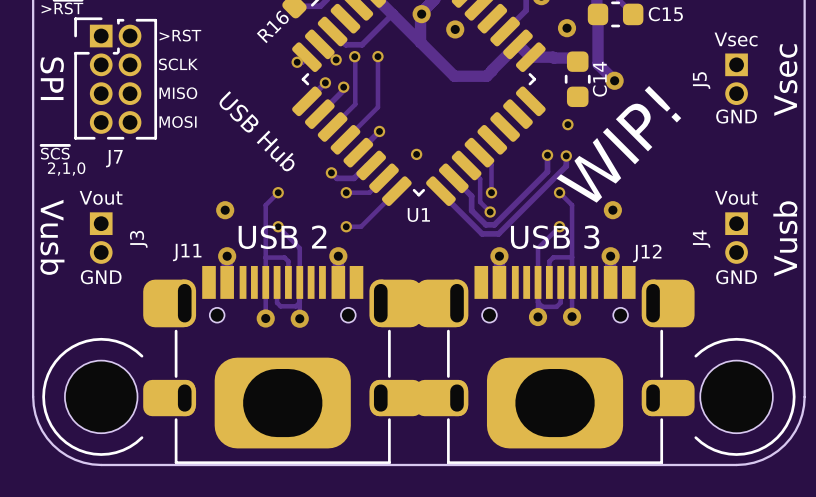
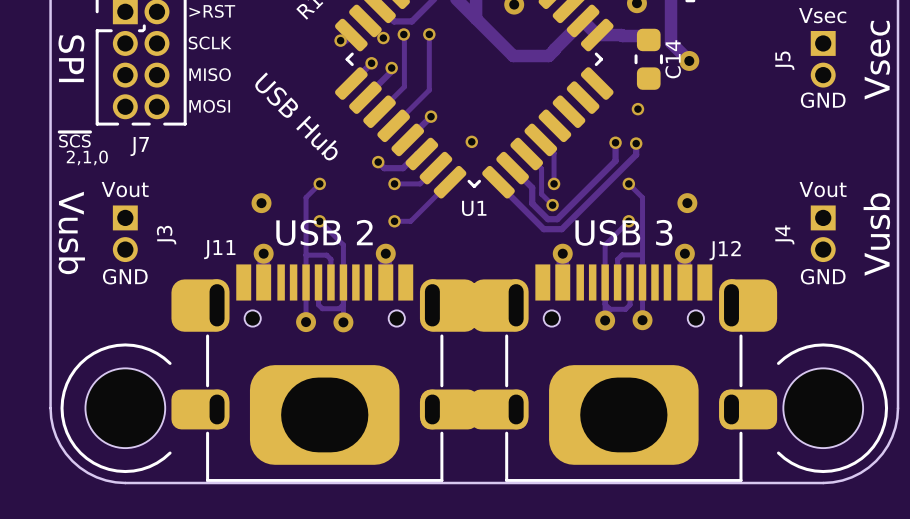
text: WIP! (618, 144) -> none

